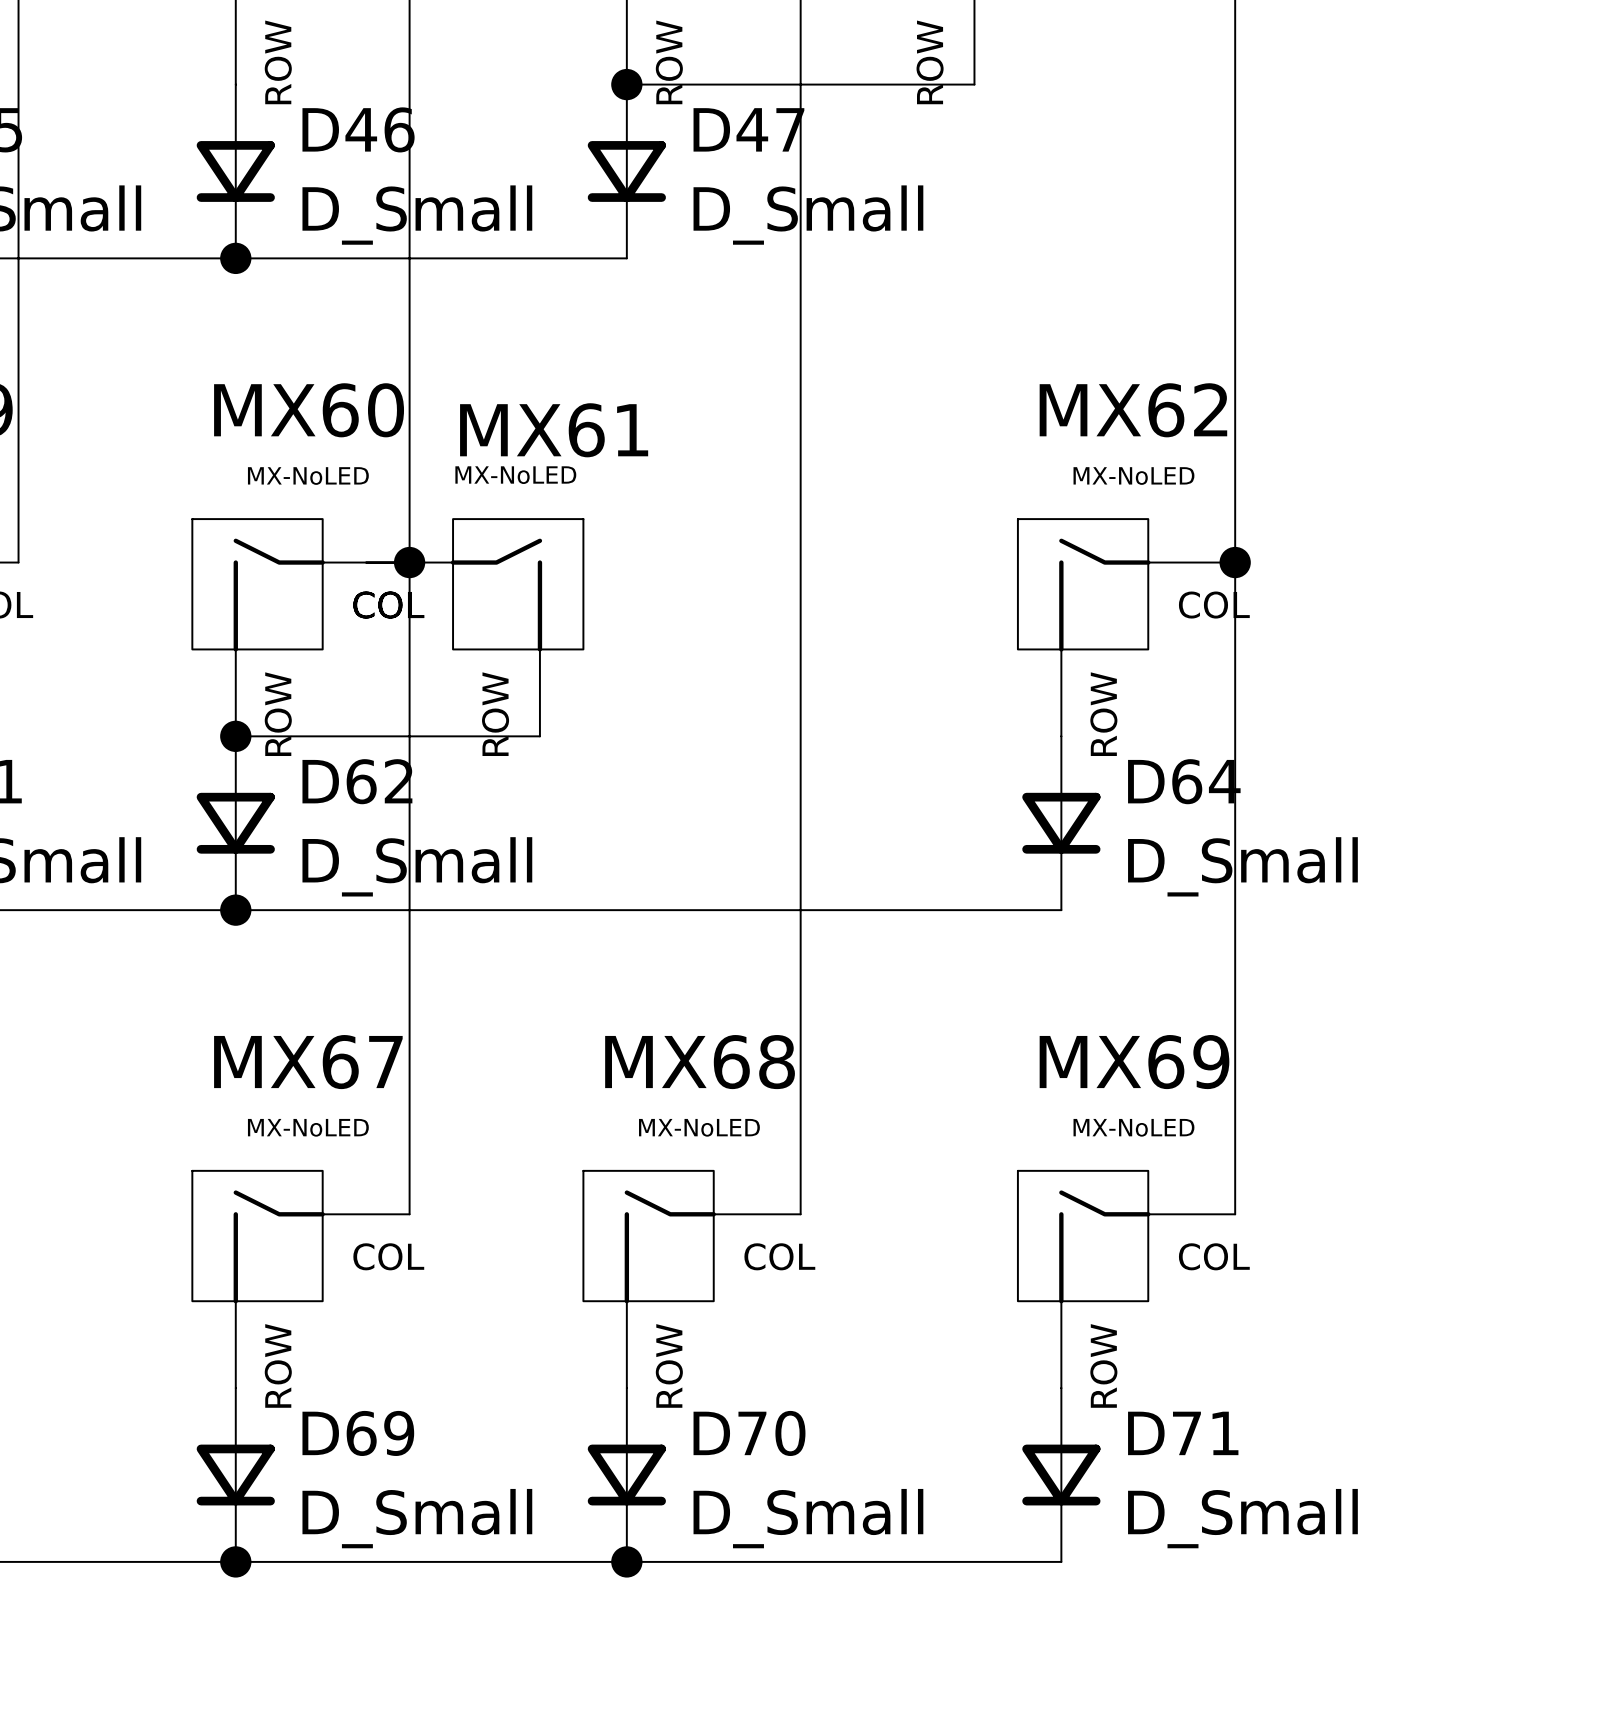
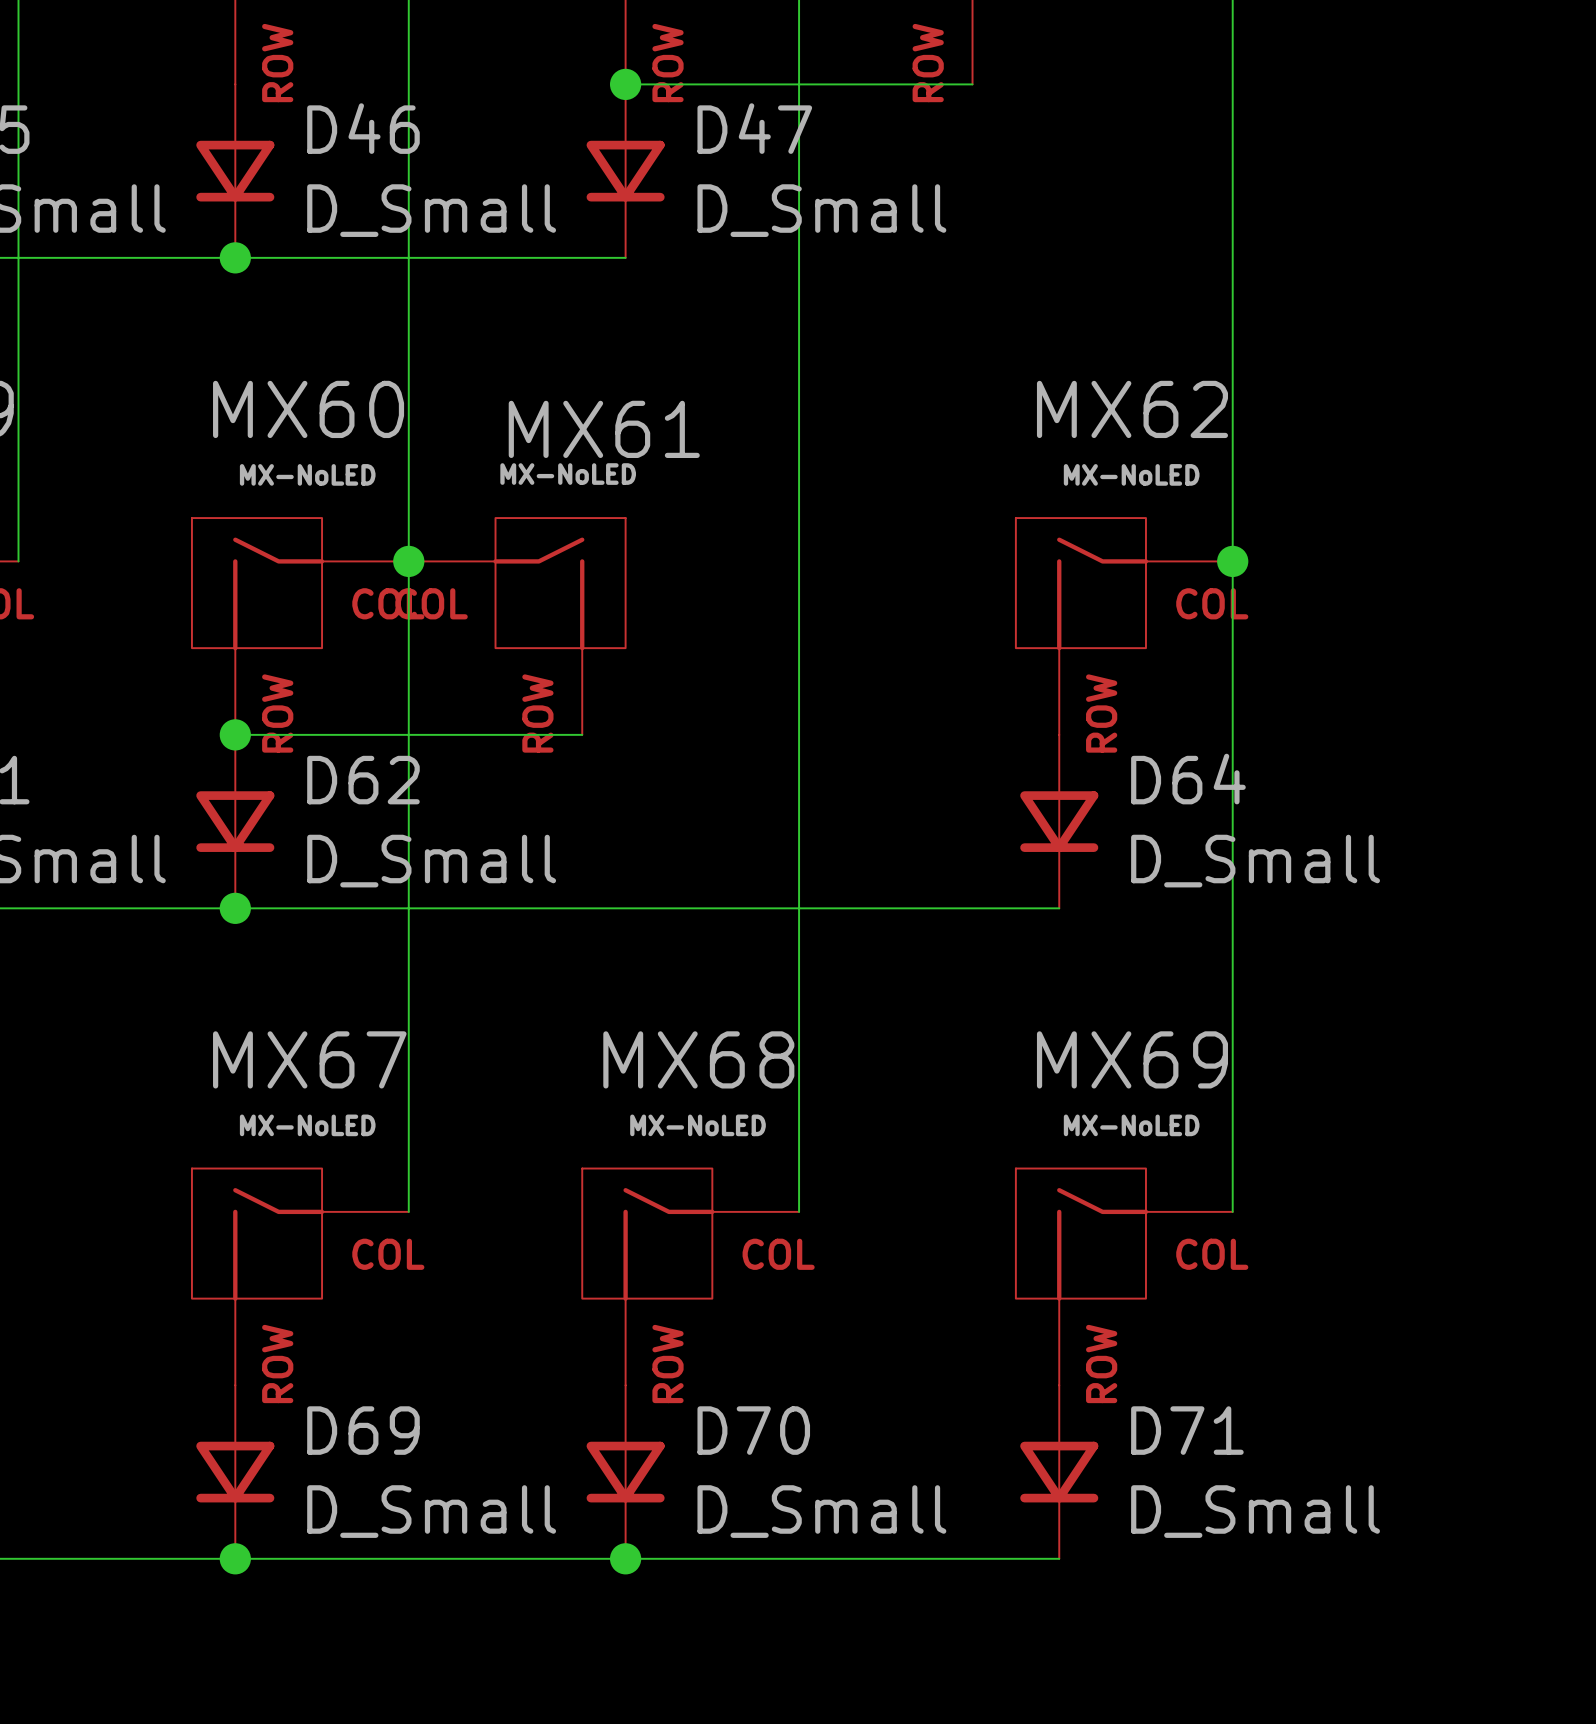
MX61 position: (474, 627) -> (517, 626)
wire: none -> (538, 734) (582, 734)

